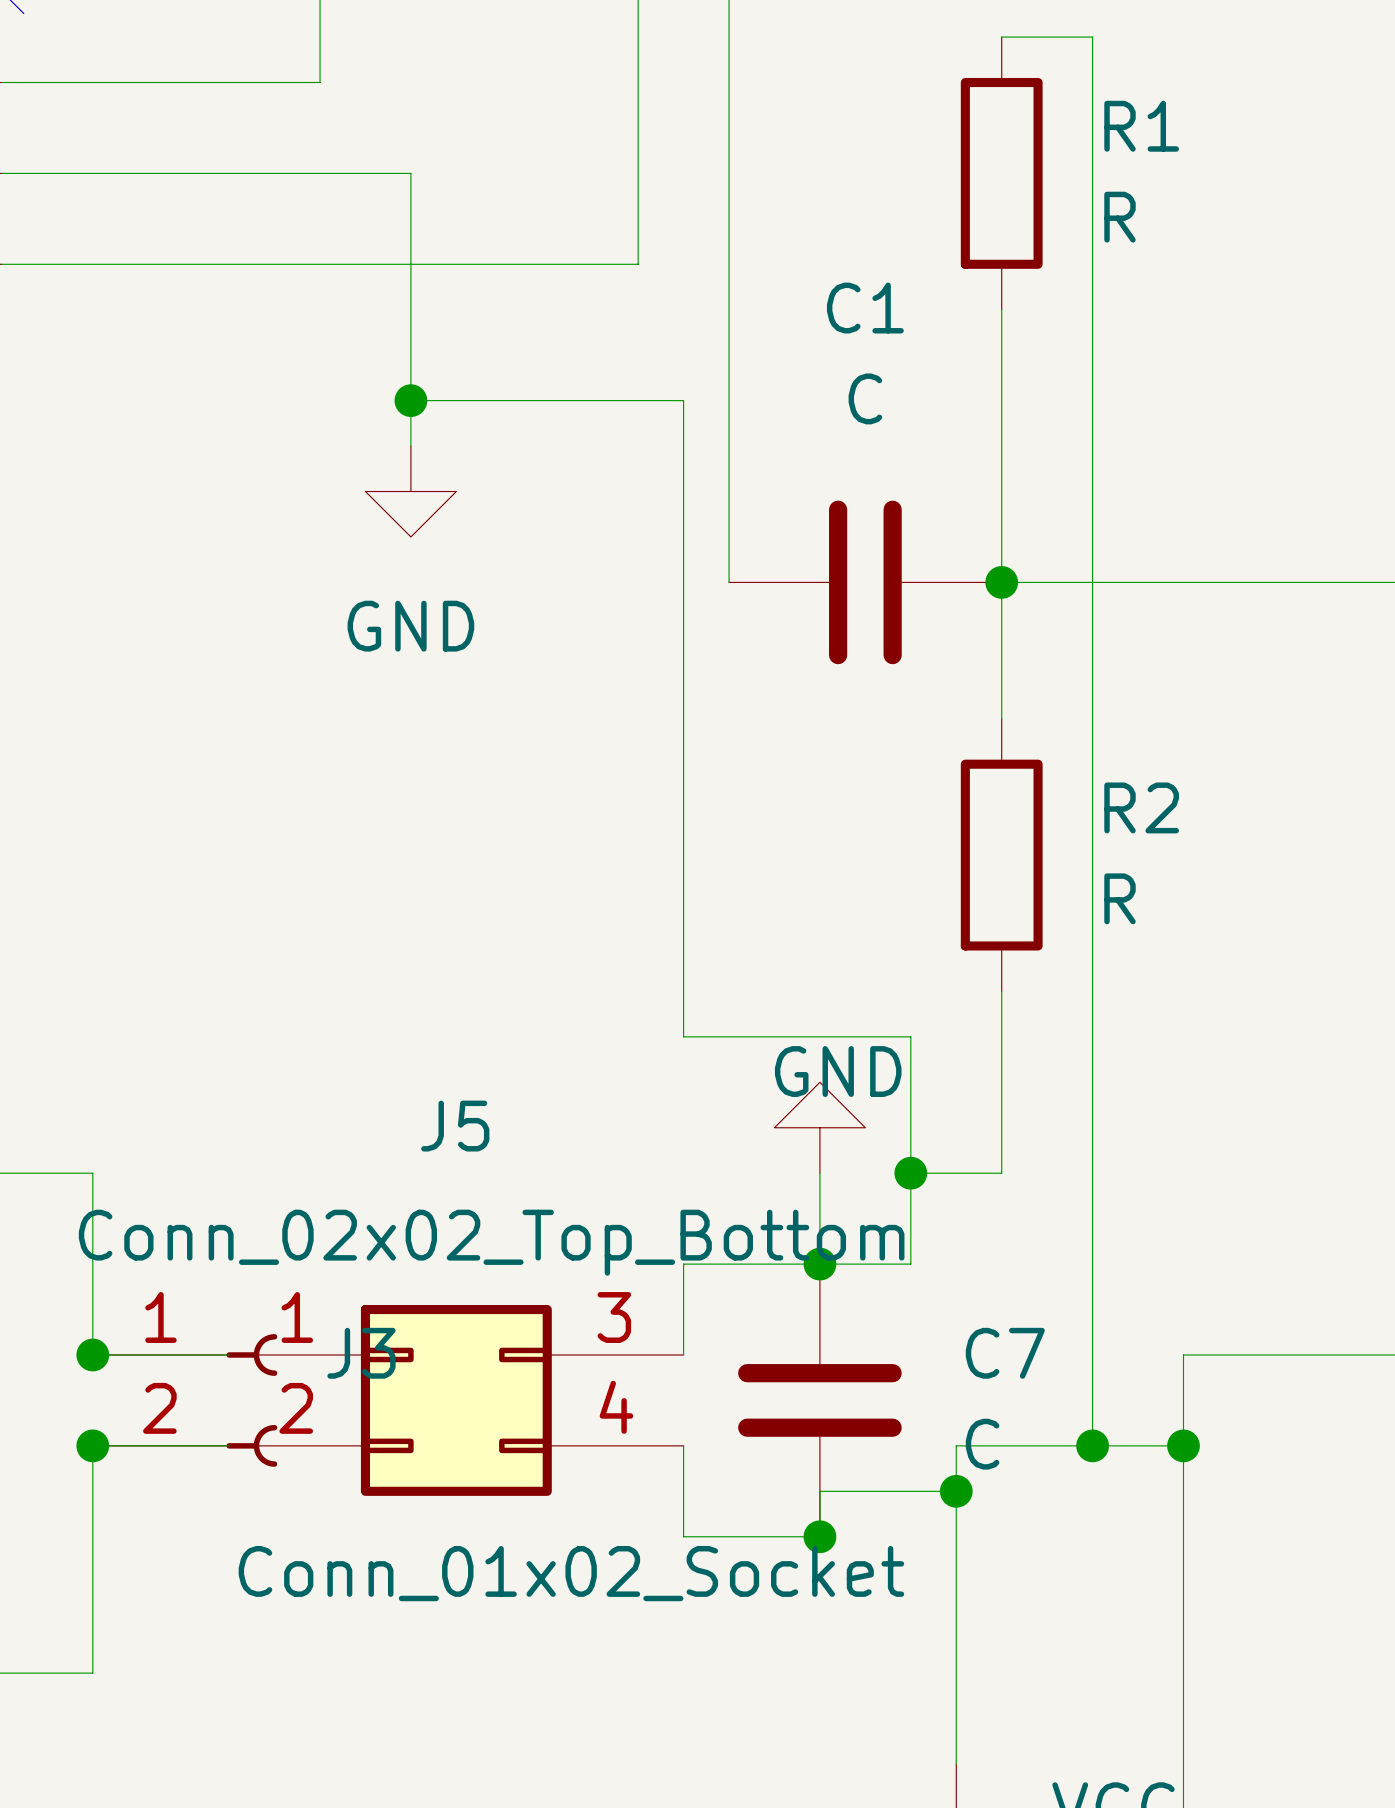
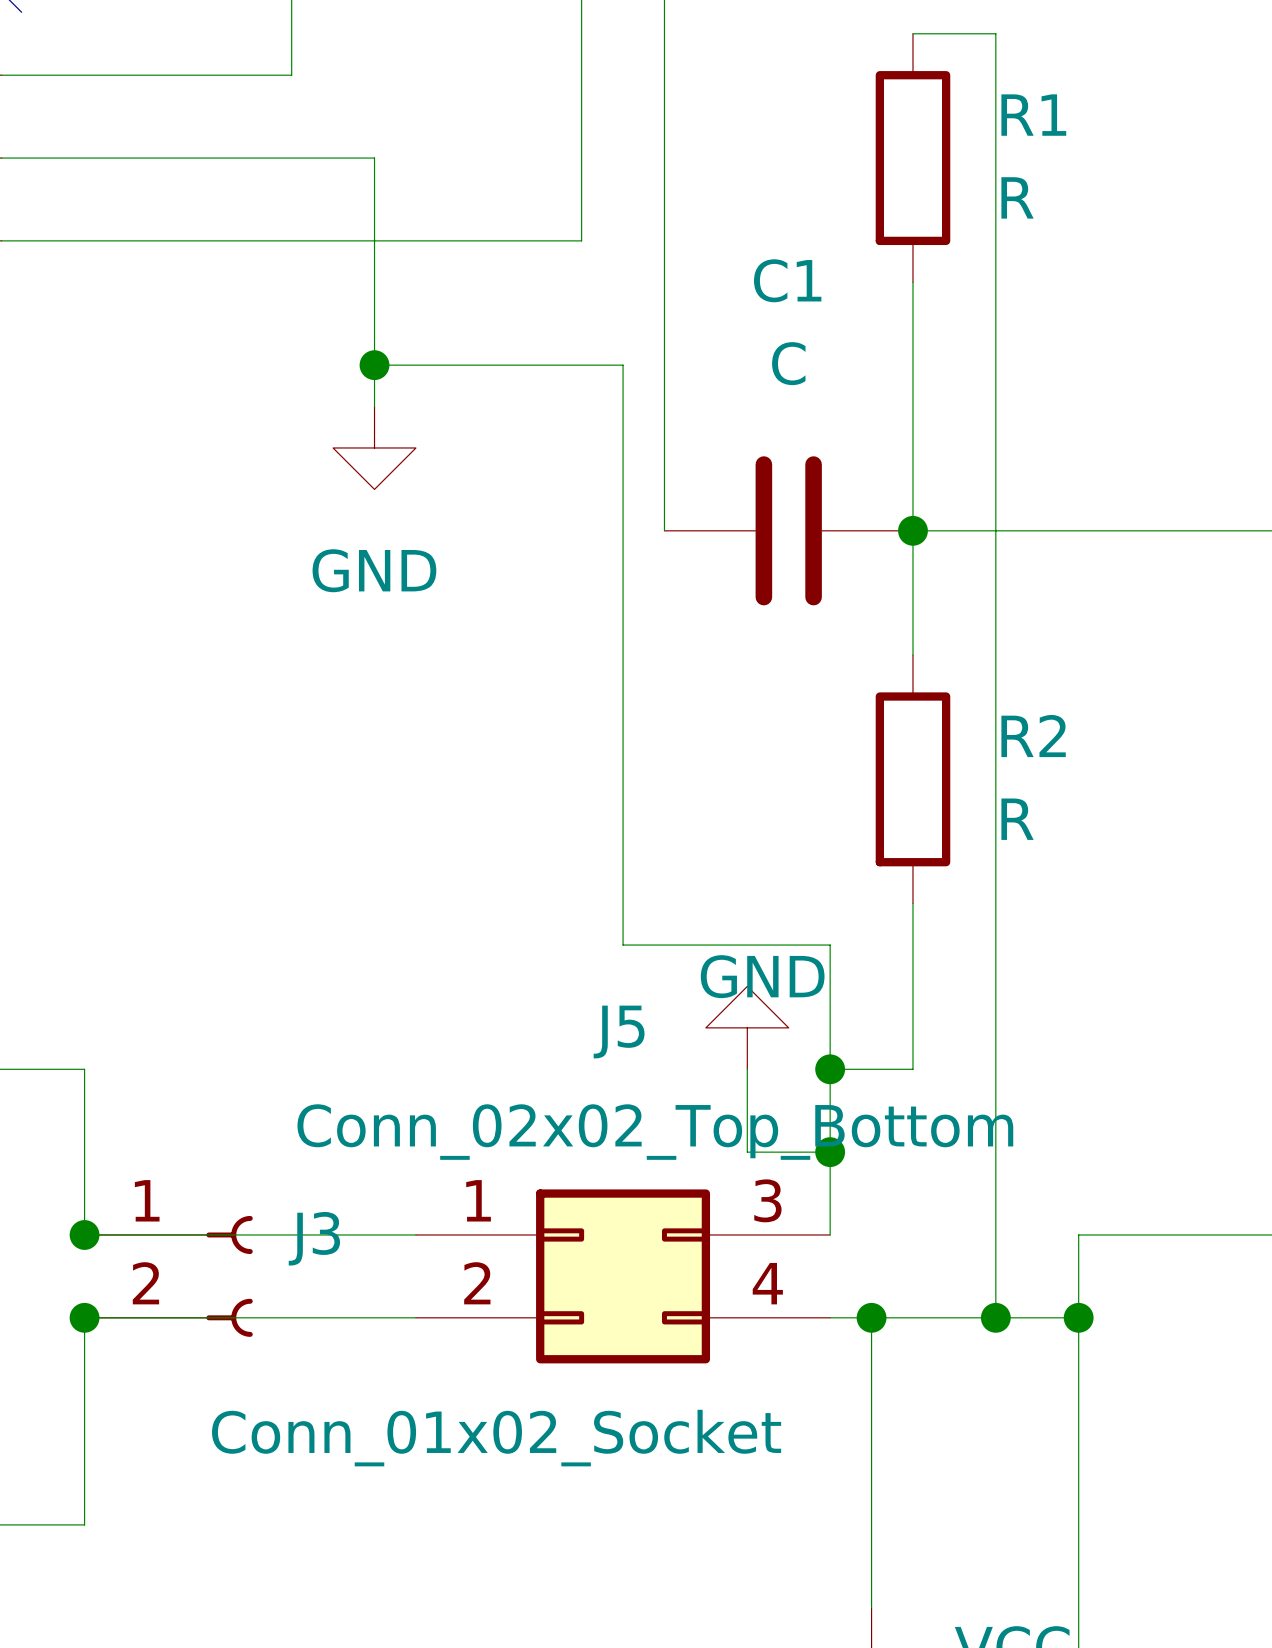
wire: (819, 1264) (683, 1264) (683, 1354) -> none
junction position: (819, 1264) -> (830, 1152)
wire: none -> (830, 1152) (830, 1234)
J5 position: (456, 1400) -> (623, 1276)
C7: C (819, 1400) -> none
wire: (683, 1445) (683, 1536) (819, 1536) (819, 1491) (956, 1491) -> none
wire: none -> (830, 1317) (871, 1317)
junction position: (956, 1491) -> (871, 1317)
junction: (819, 1536) -> none

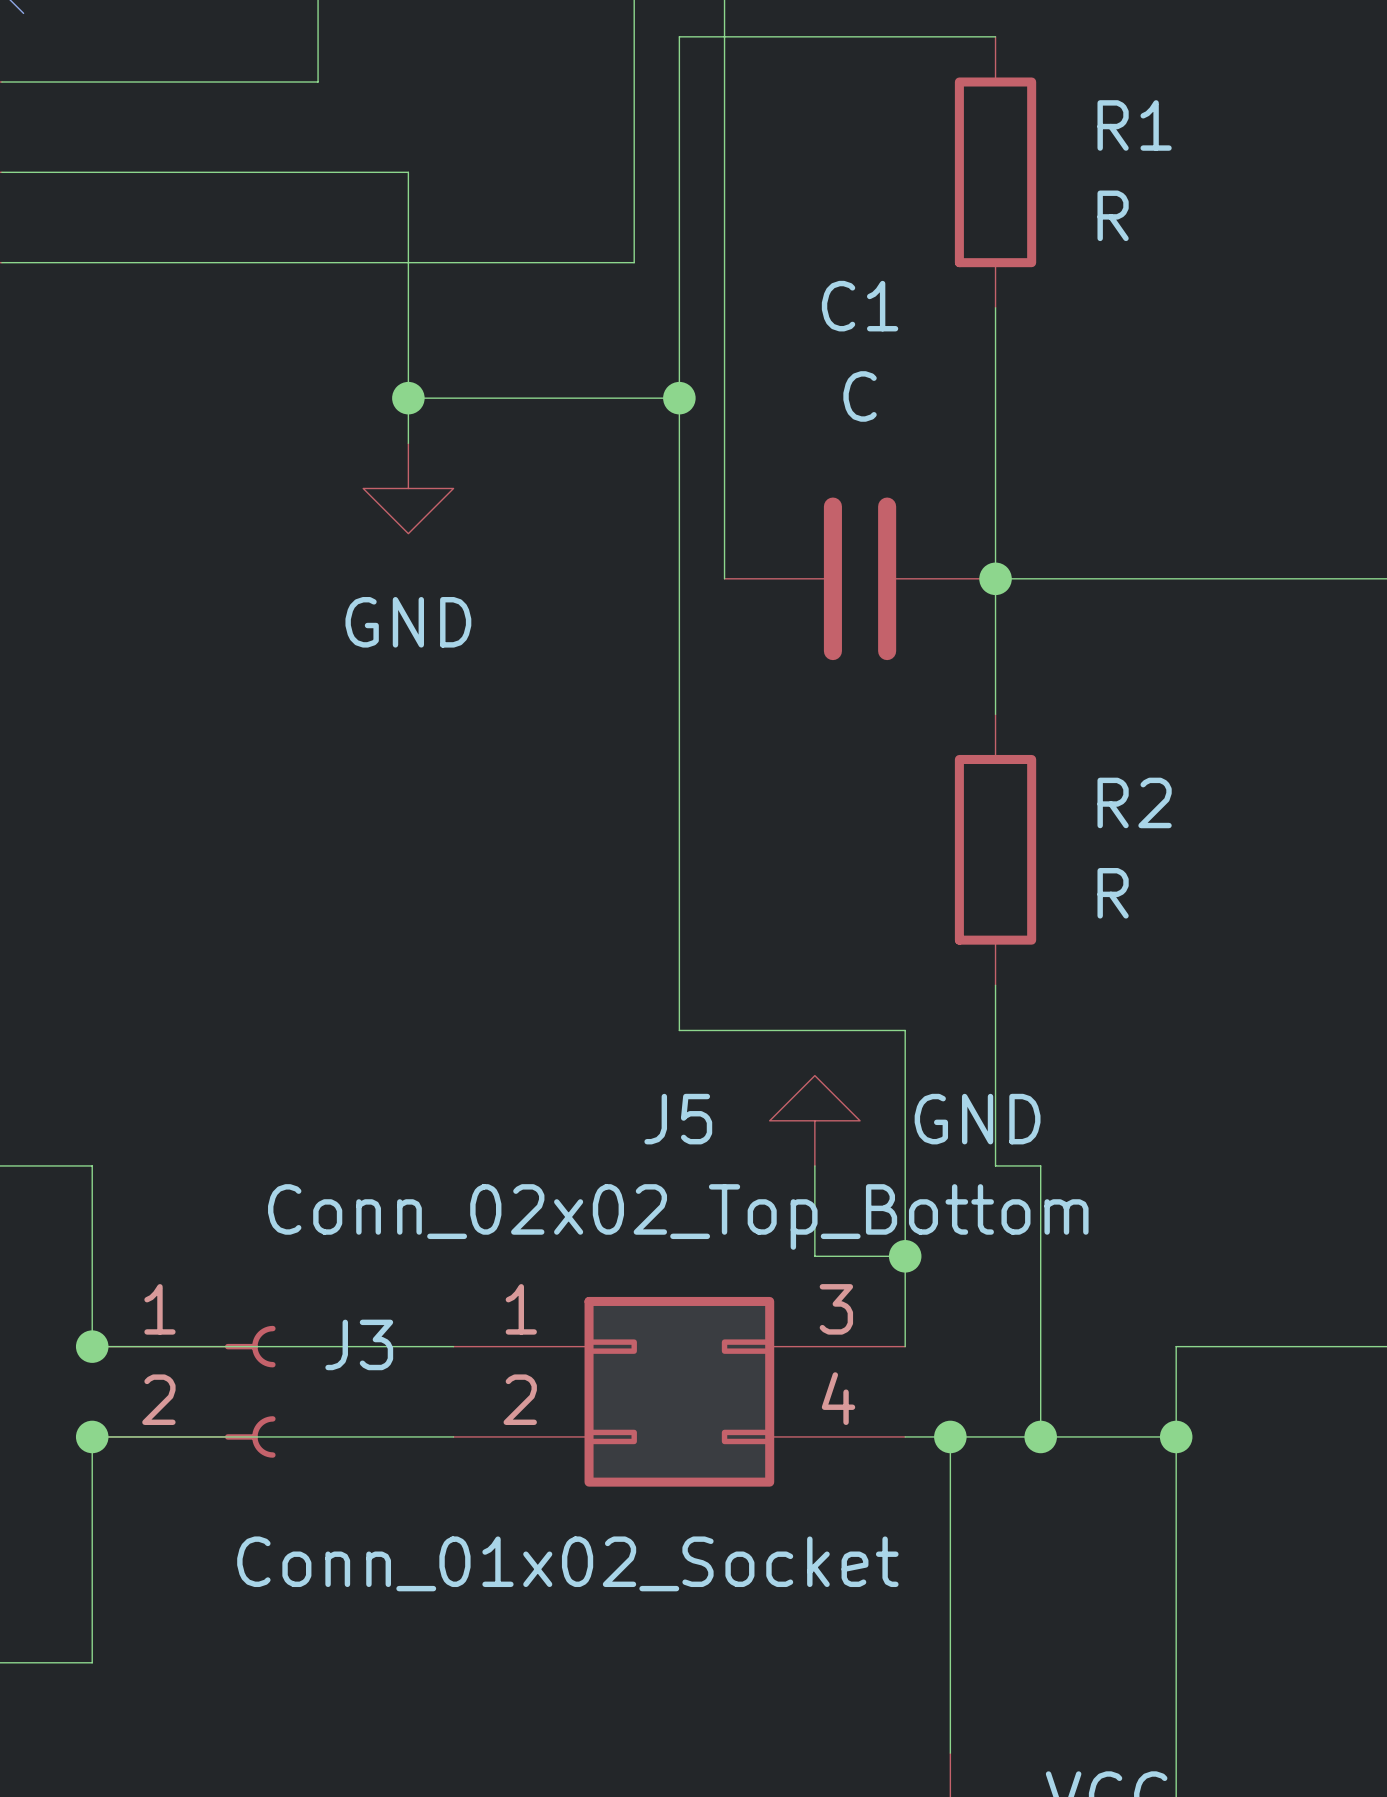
wire: (912, 33) (995, 33) (995, 1317) -> (995, 36) (679, 36) (679, 398)
junction: none -> (679, 398)
power symbol text position: GND (762, 976) -> GND (977, 1119)
wire: (830, 1069) (912, 1069) -> (1040, 1436) (1040, 1165) (995, 1165)
junction: (830, 1069) -> none
J5 value position: Conn_02x02_Top_Bottom (655, 1132) -> Conn_02x02_Top_Bottom (678, 1216)
junction position: (995, 1317) -> (1040, 1436)

